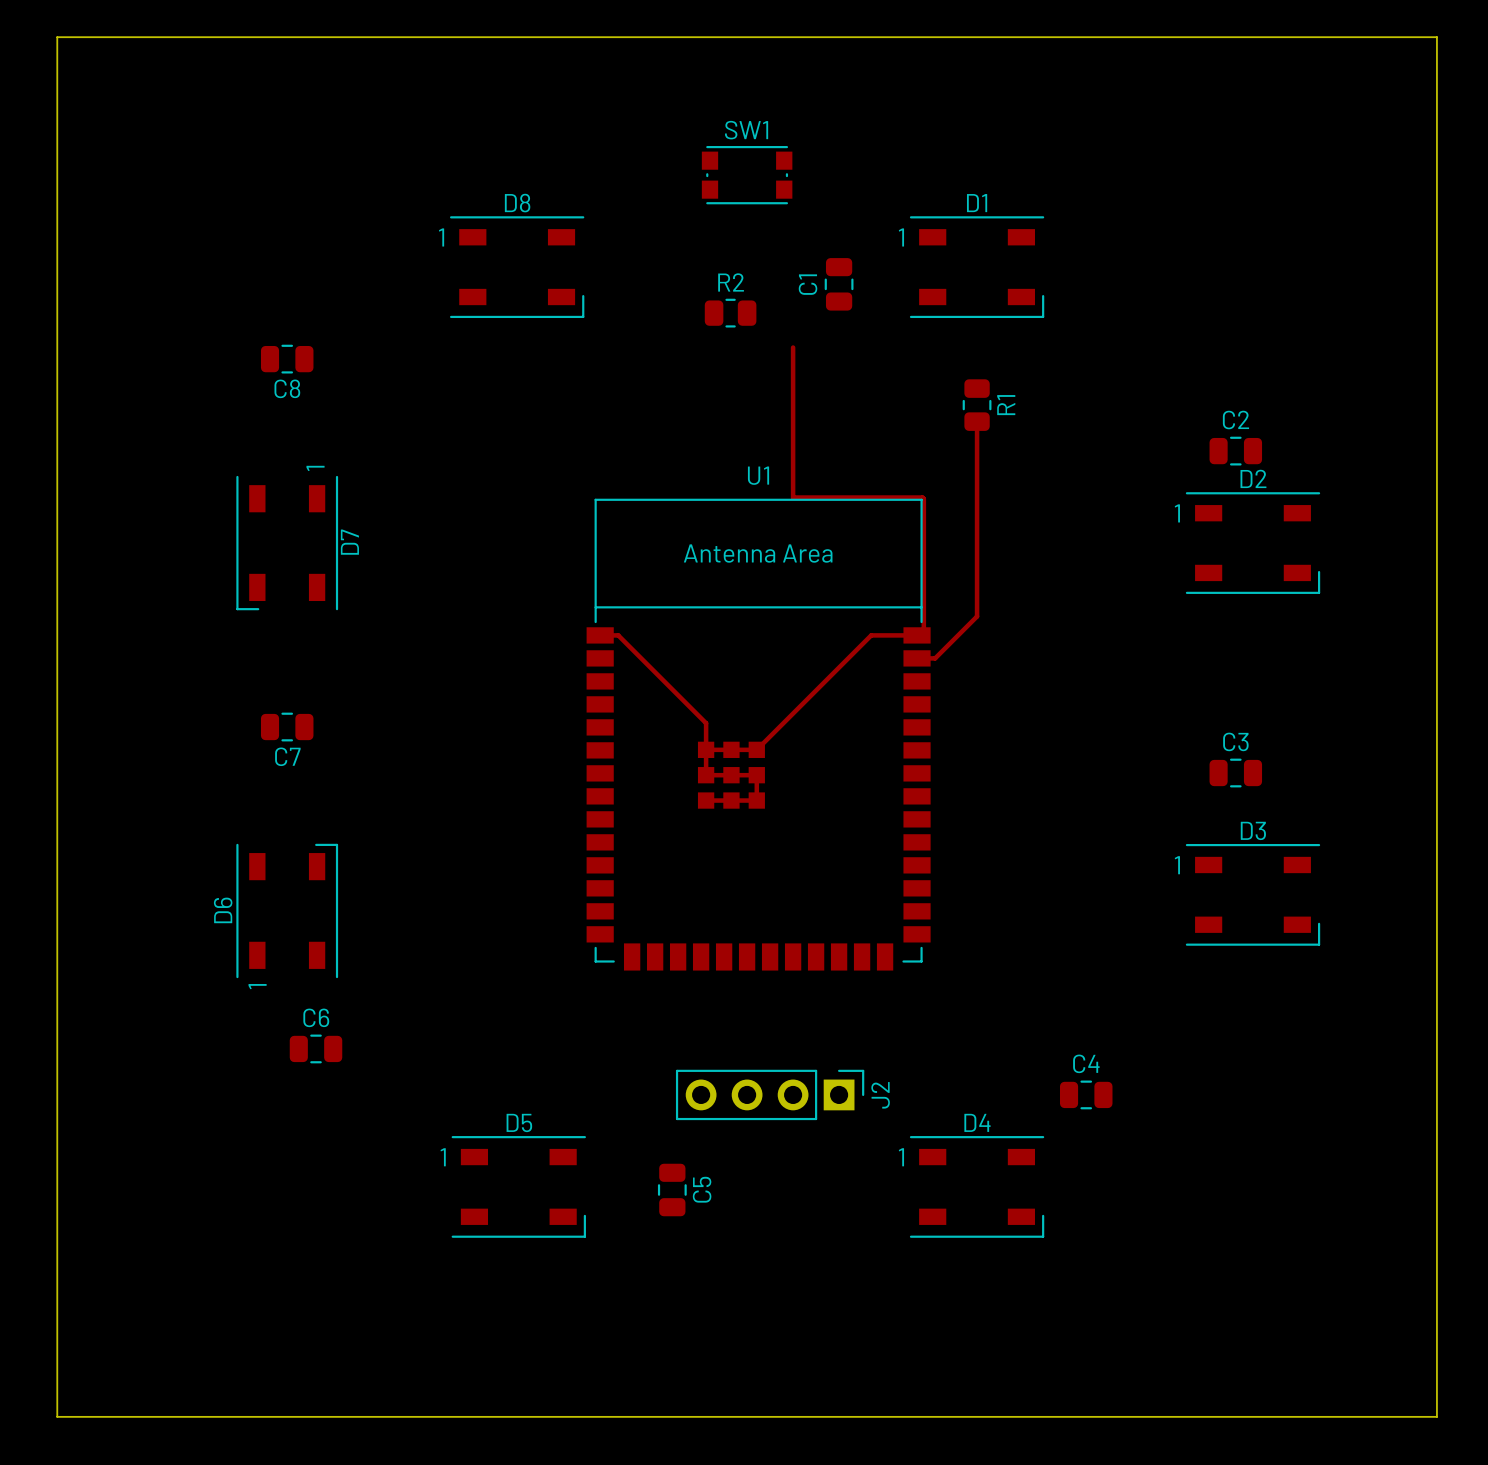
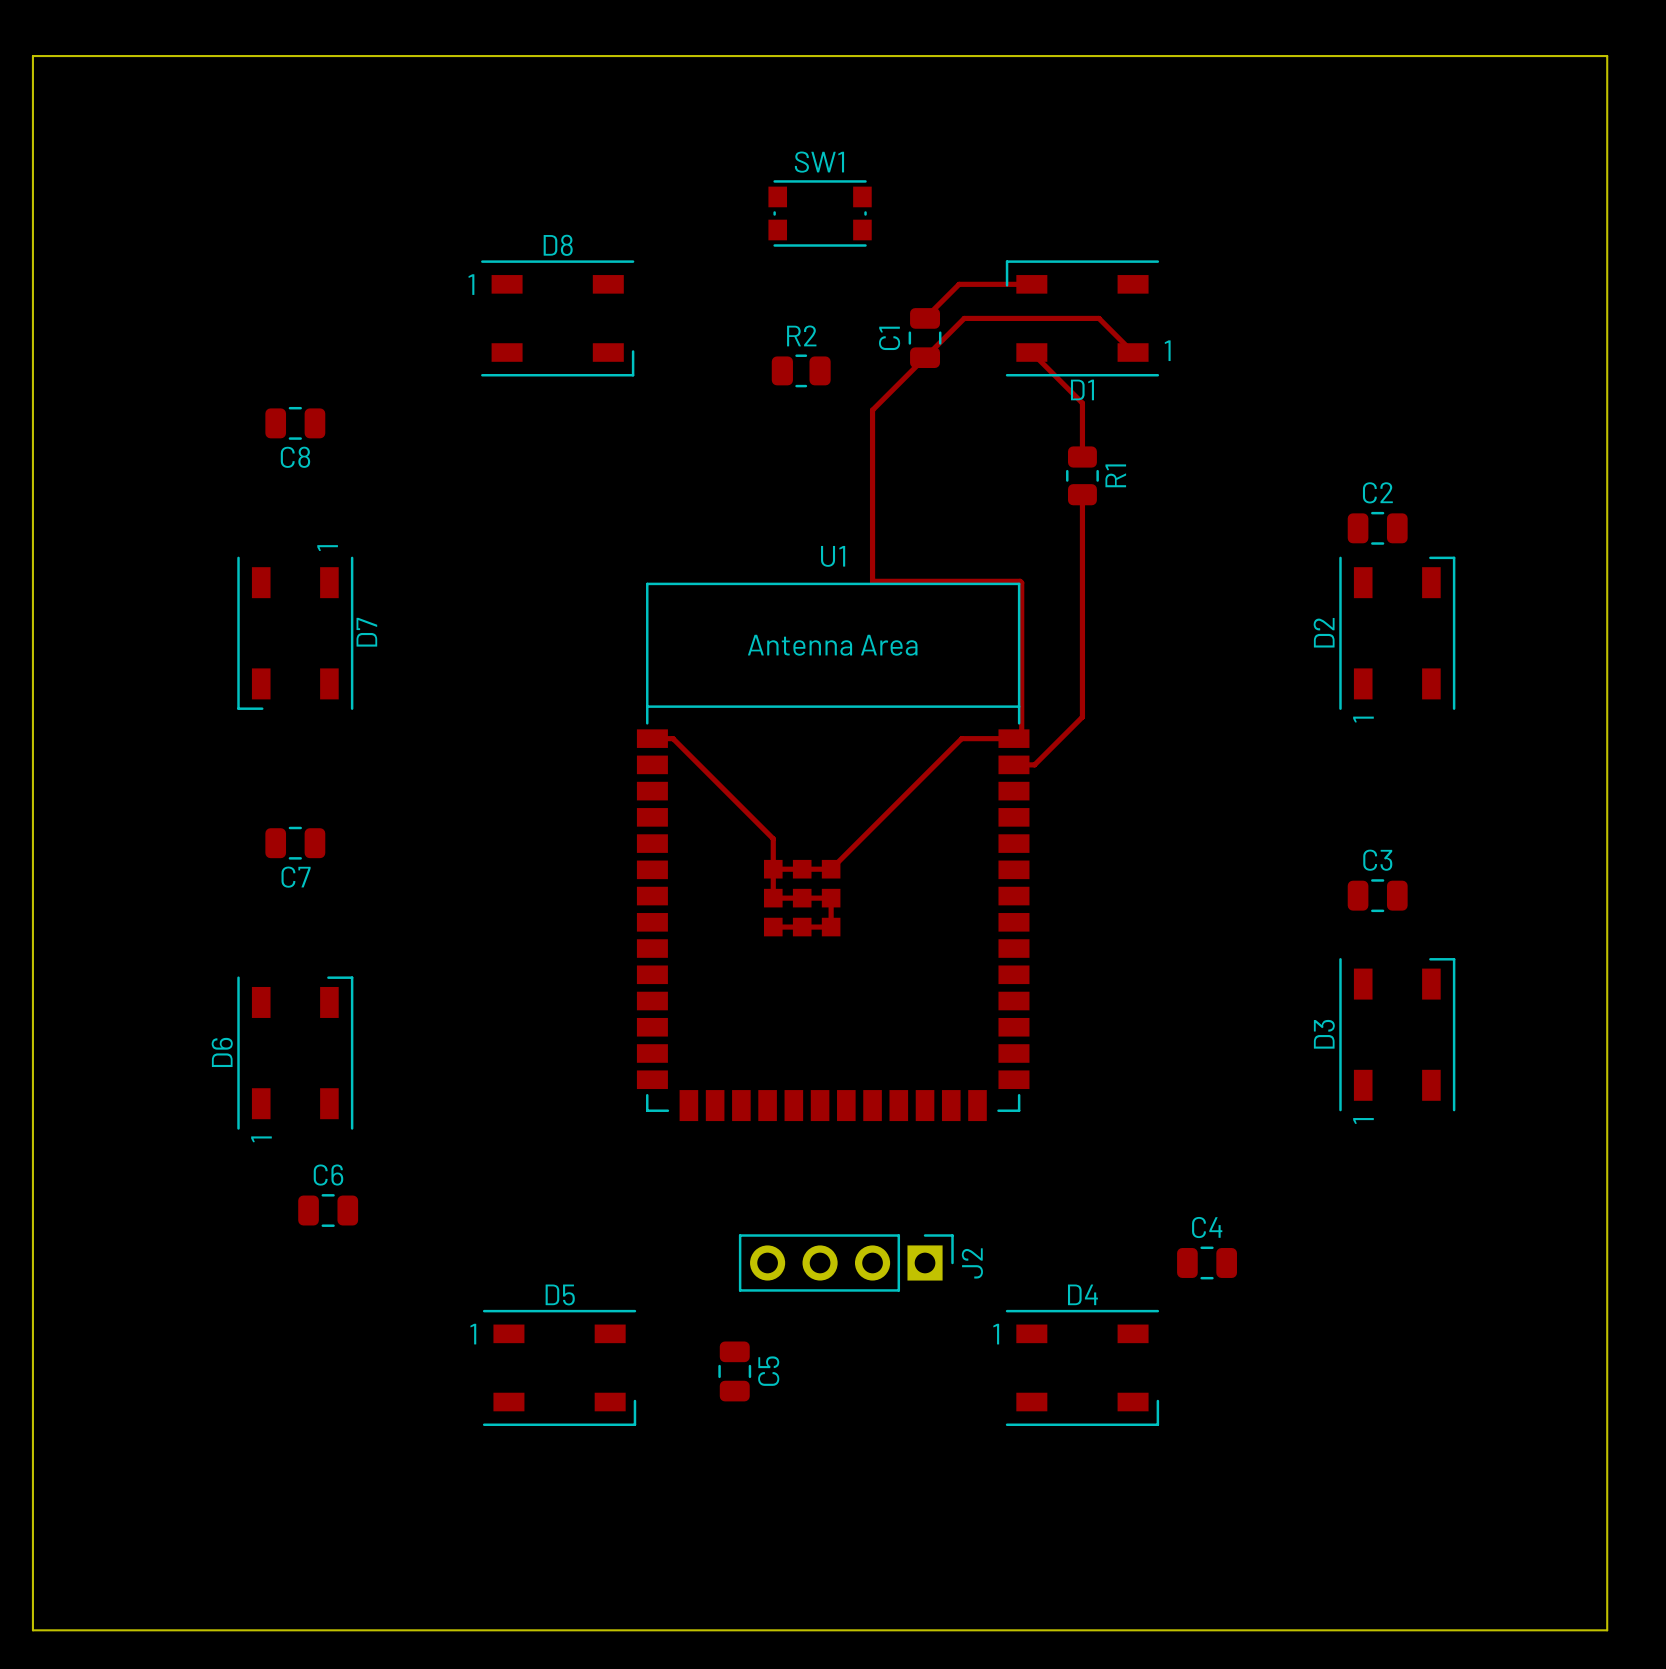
track: none -> (1031, 284) (959, 284) (925, 318)
D1 rotation: 0° (977, 267) -> 180° (1082, 318)
track: none -> (1031, 352) (1082, 403) (1082, 457)
track: none -> (1133, 352) (1098, 318) (964, 318) (872, 410)
D2 rotation: 0° (1252, 543) -> 90° counterclockwise (1397, 633)
D3 rotation: 0° (1252, 894) -> 90° counterclockwise (1397, 1034)

